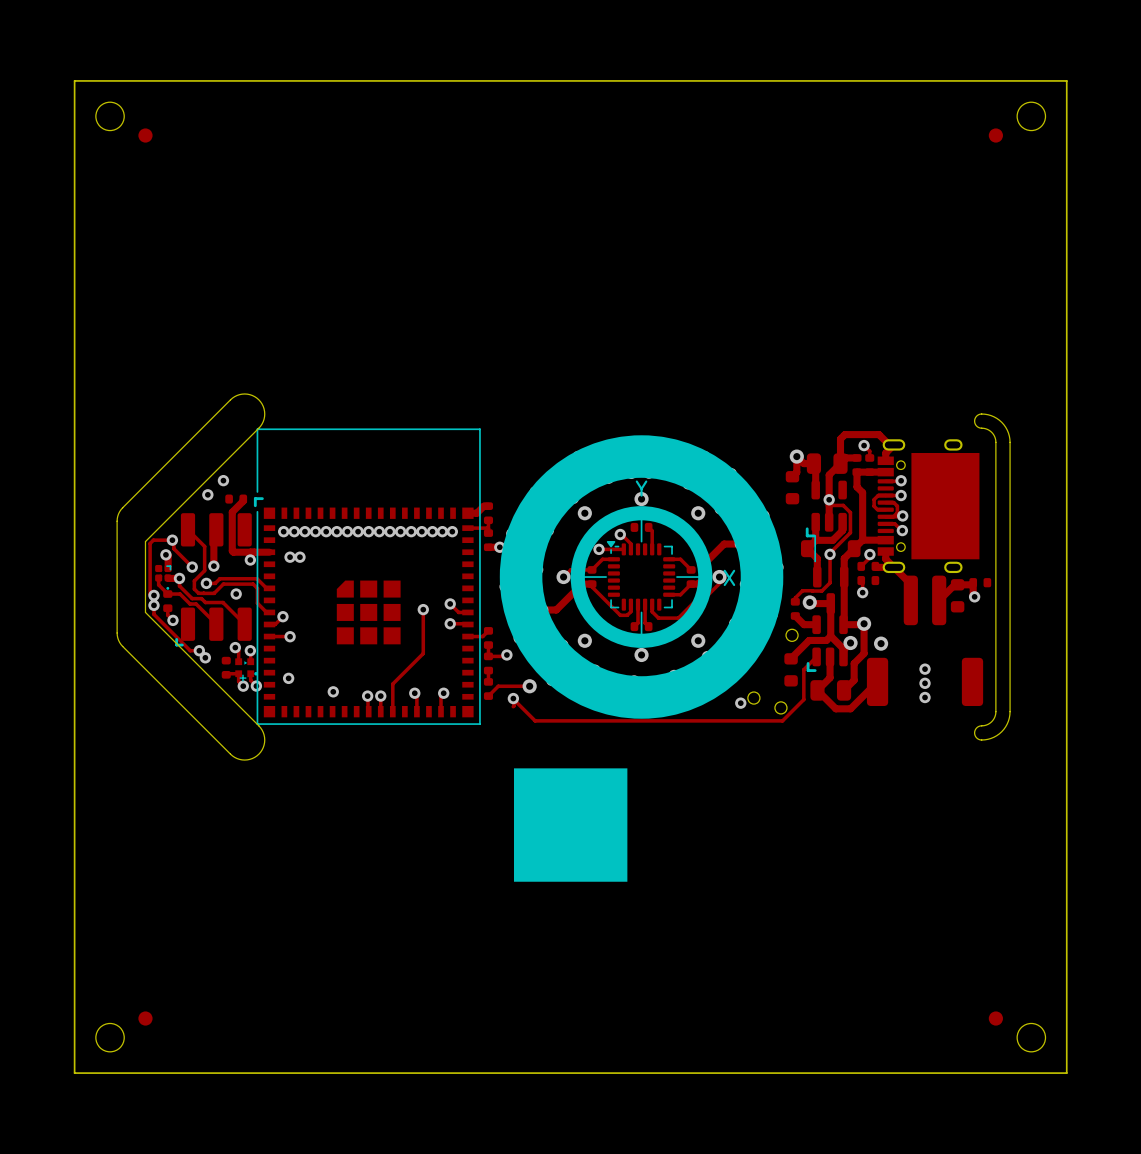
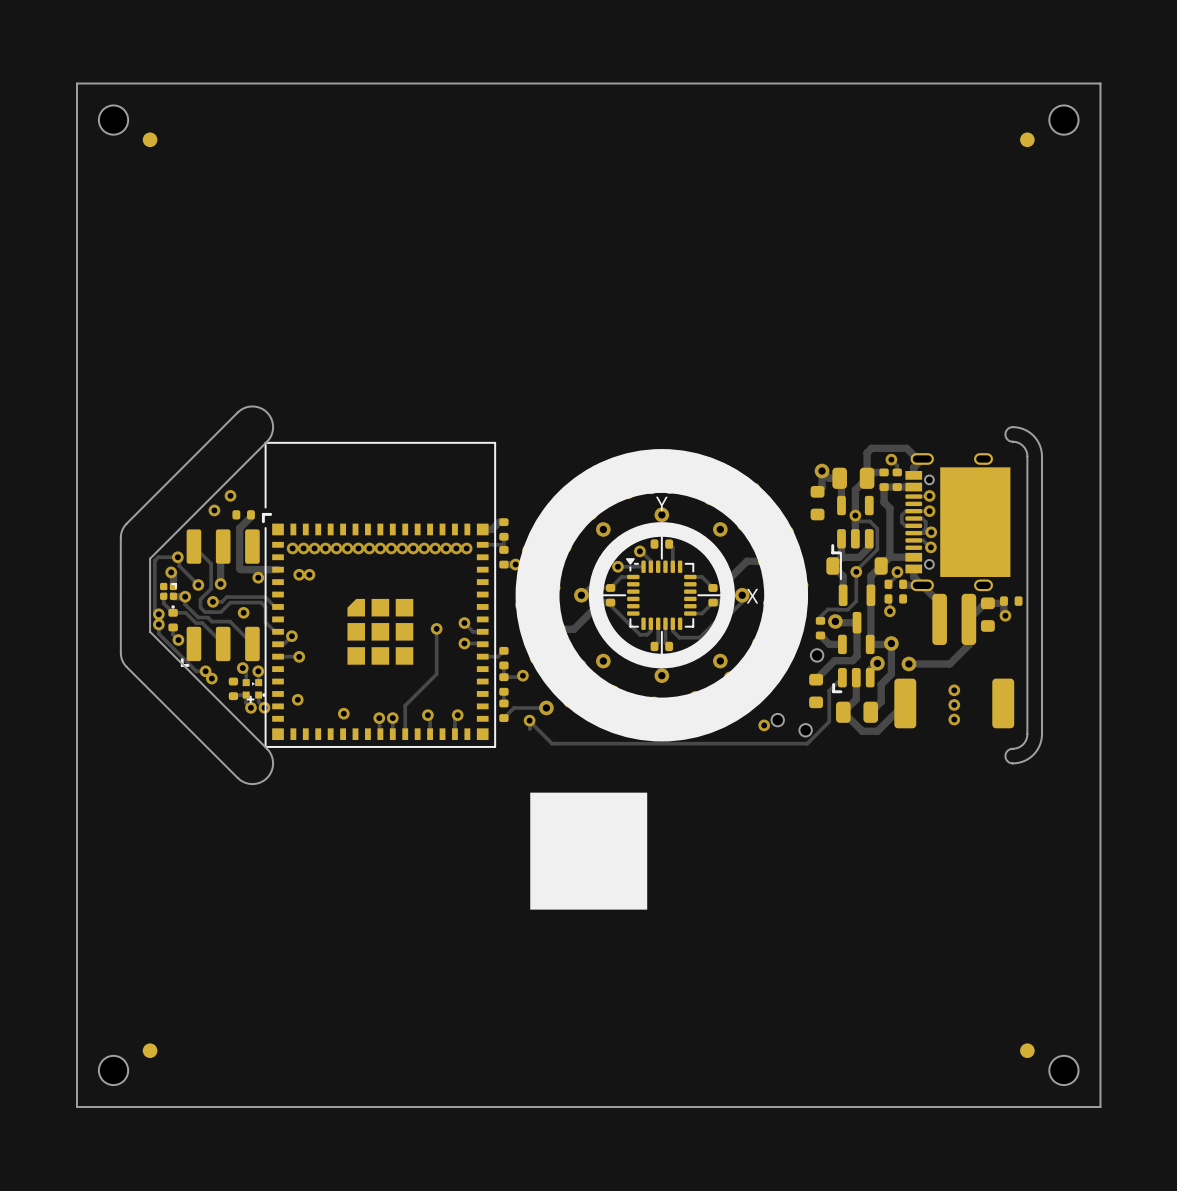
track: none -> (968, 619) (968, 644) (949, 663) (908, 663)
track: (830, 636) (843, 648) -> none

